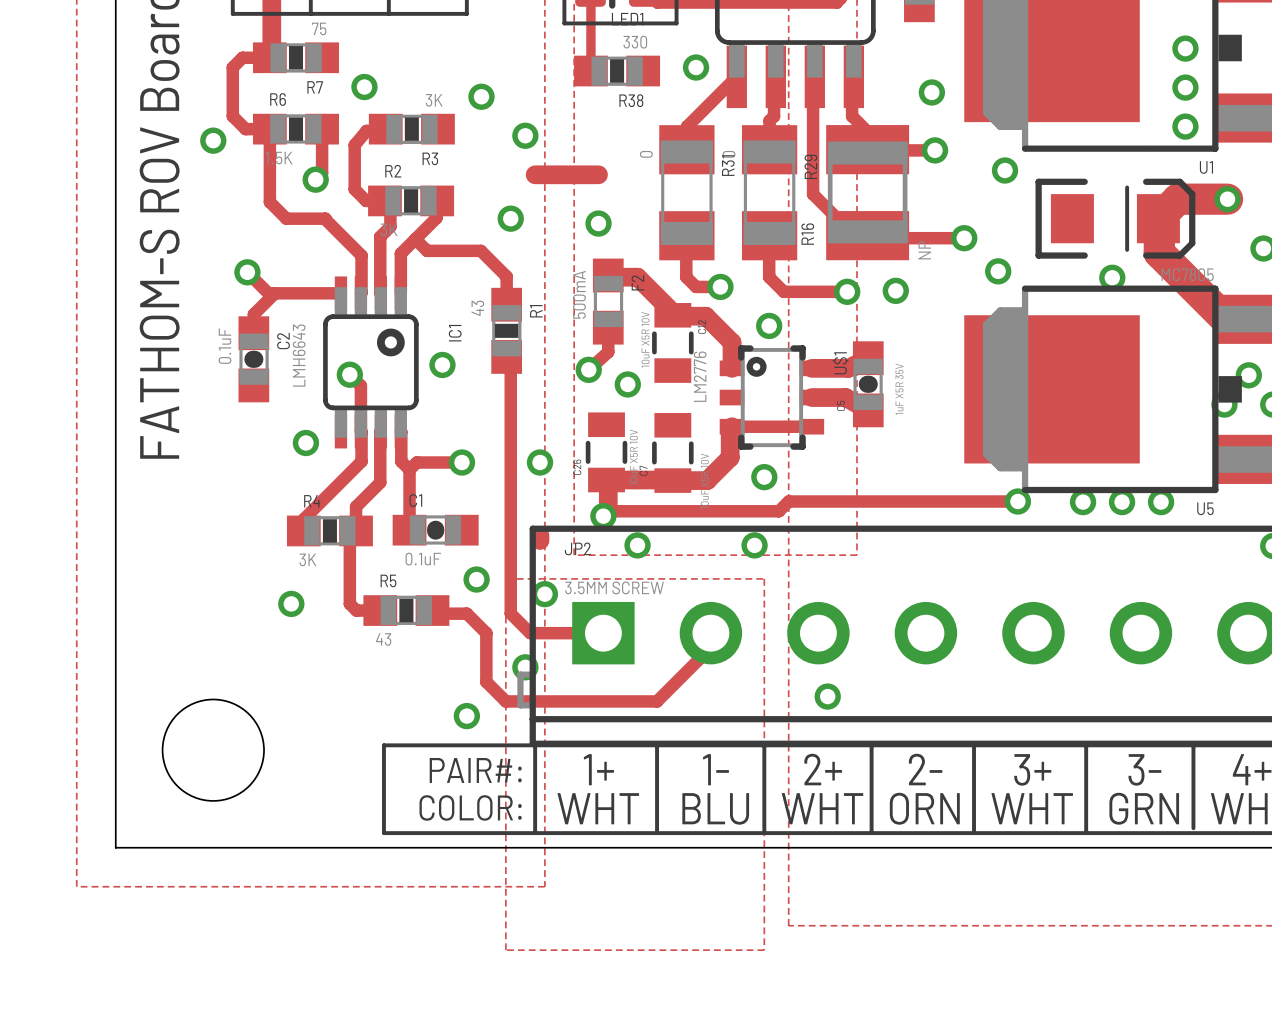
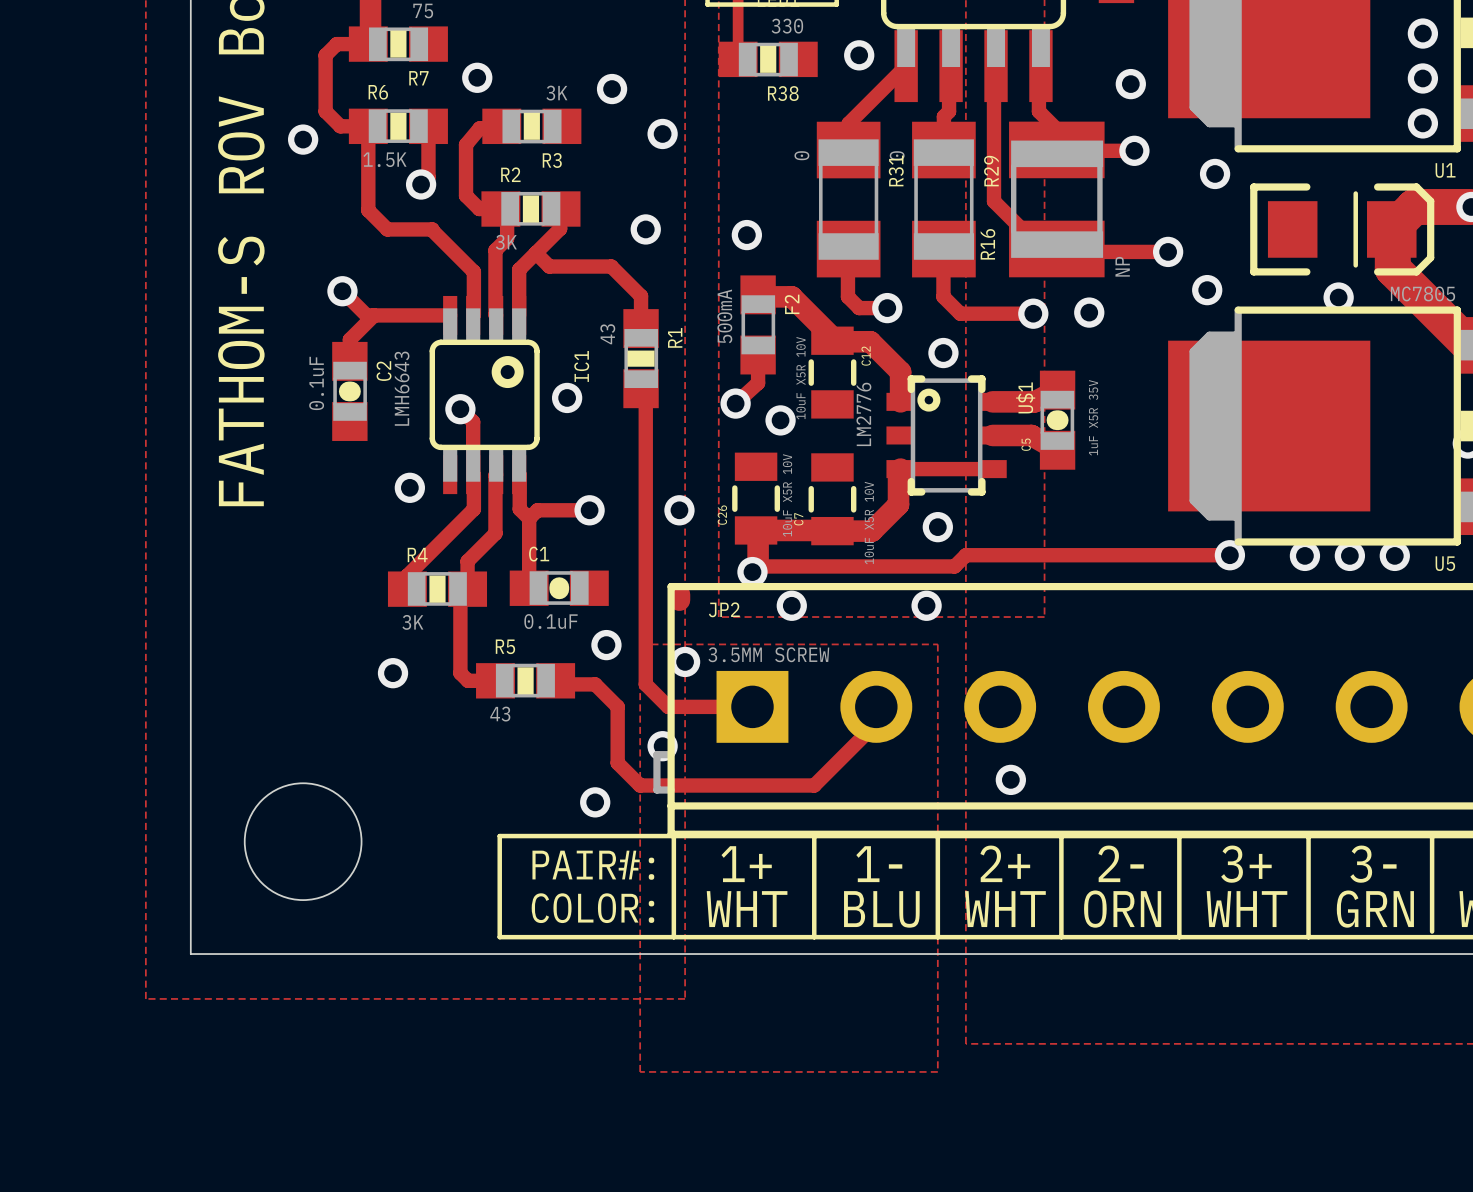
track: (535, 174) (598, 174) -> none

